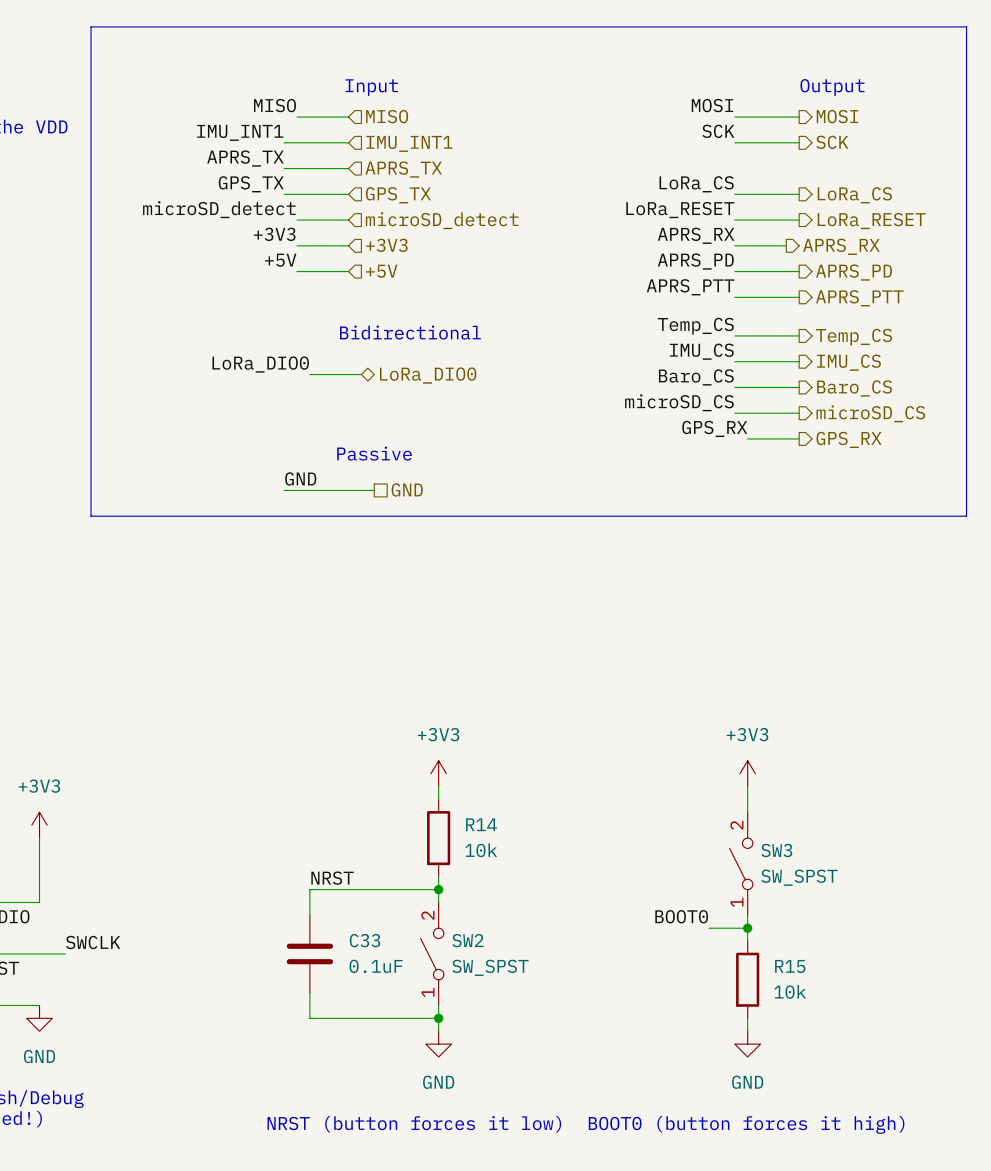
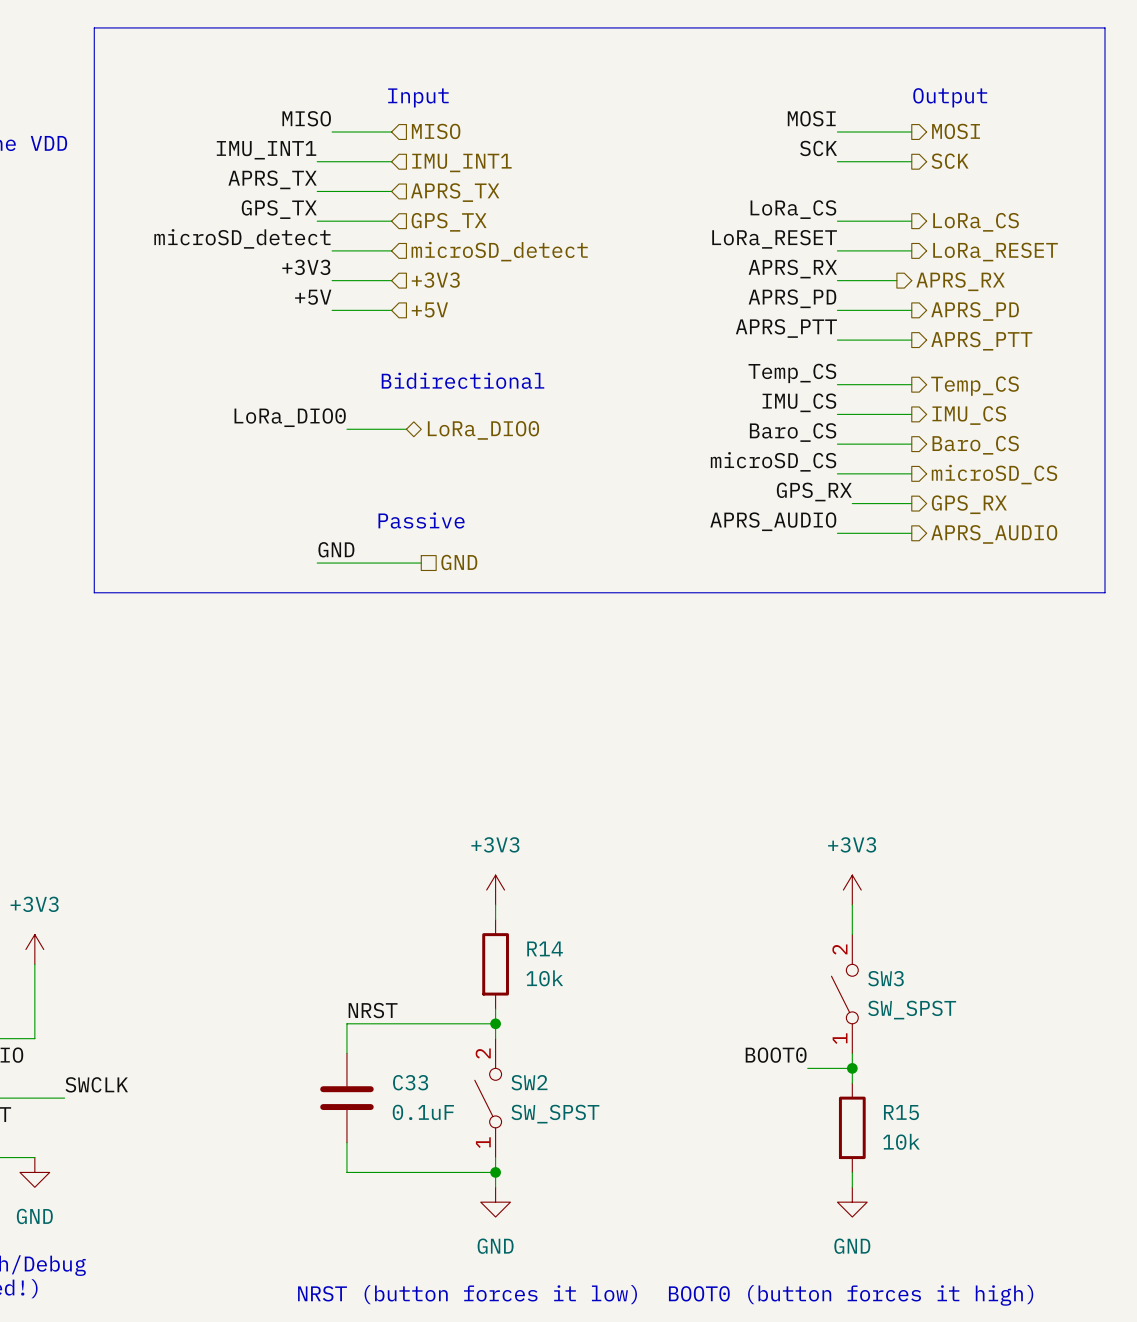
label: none -> APRS_AUDIO (773, 521)
wire: none -> (837, 533) (911, 533)
hierarchical label: none -> APRS_AUDIO (994, 534)

